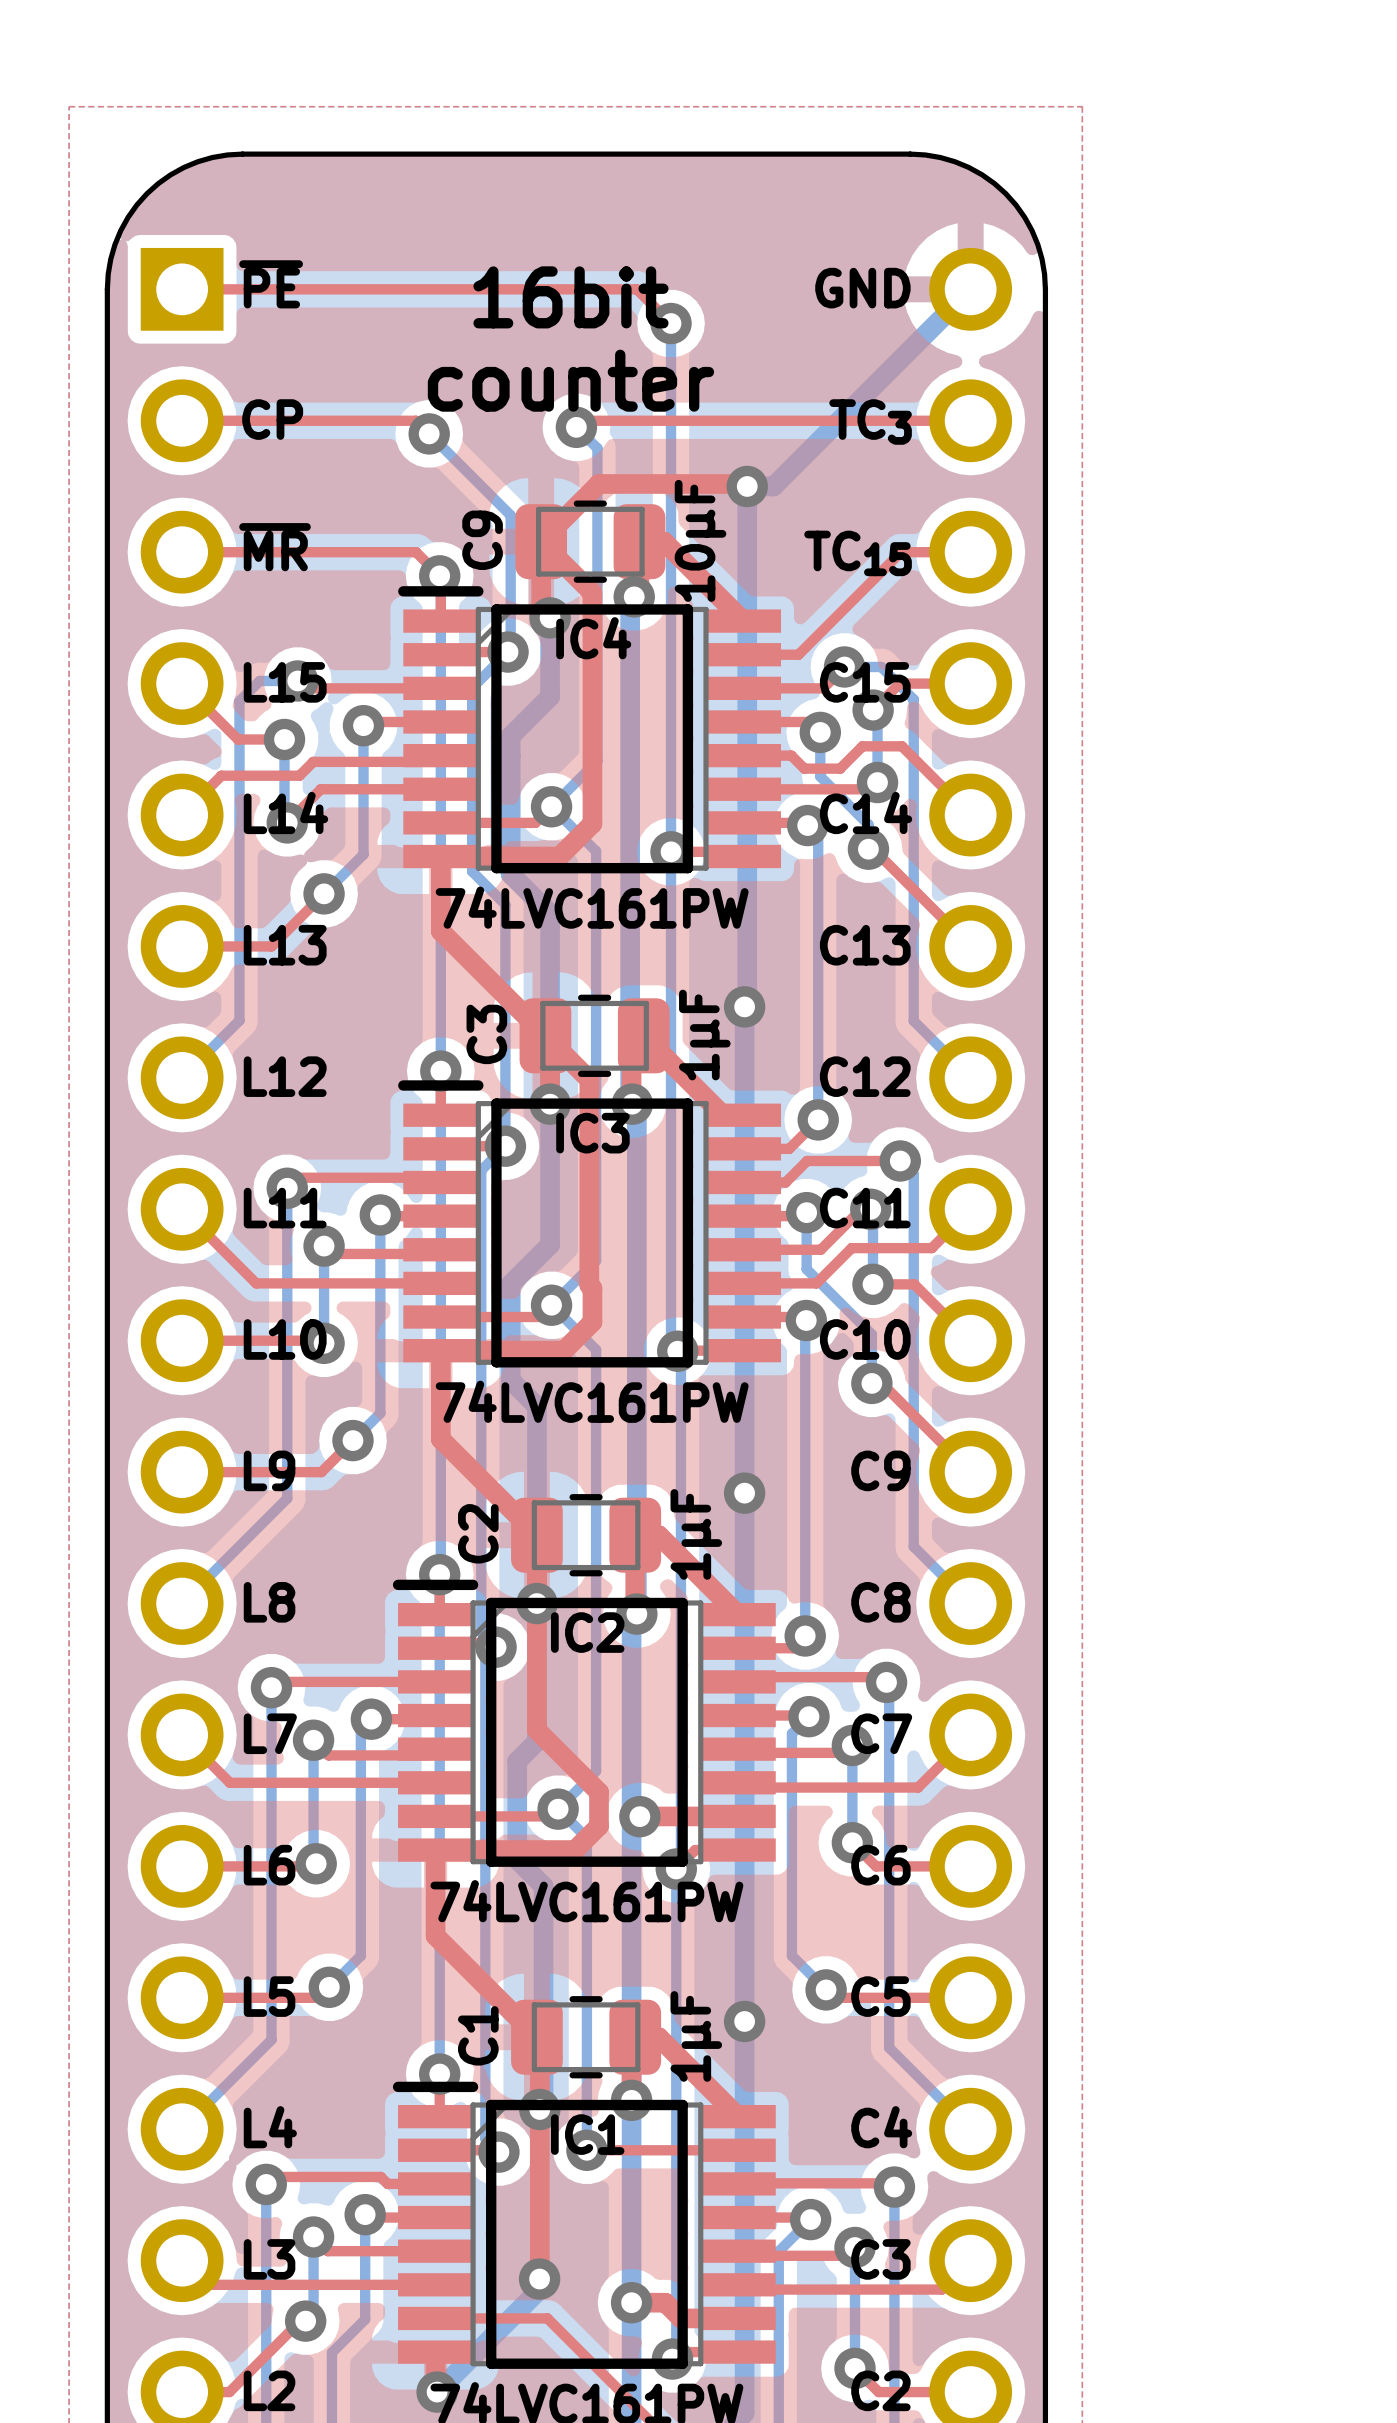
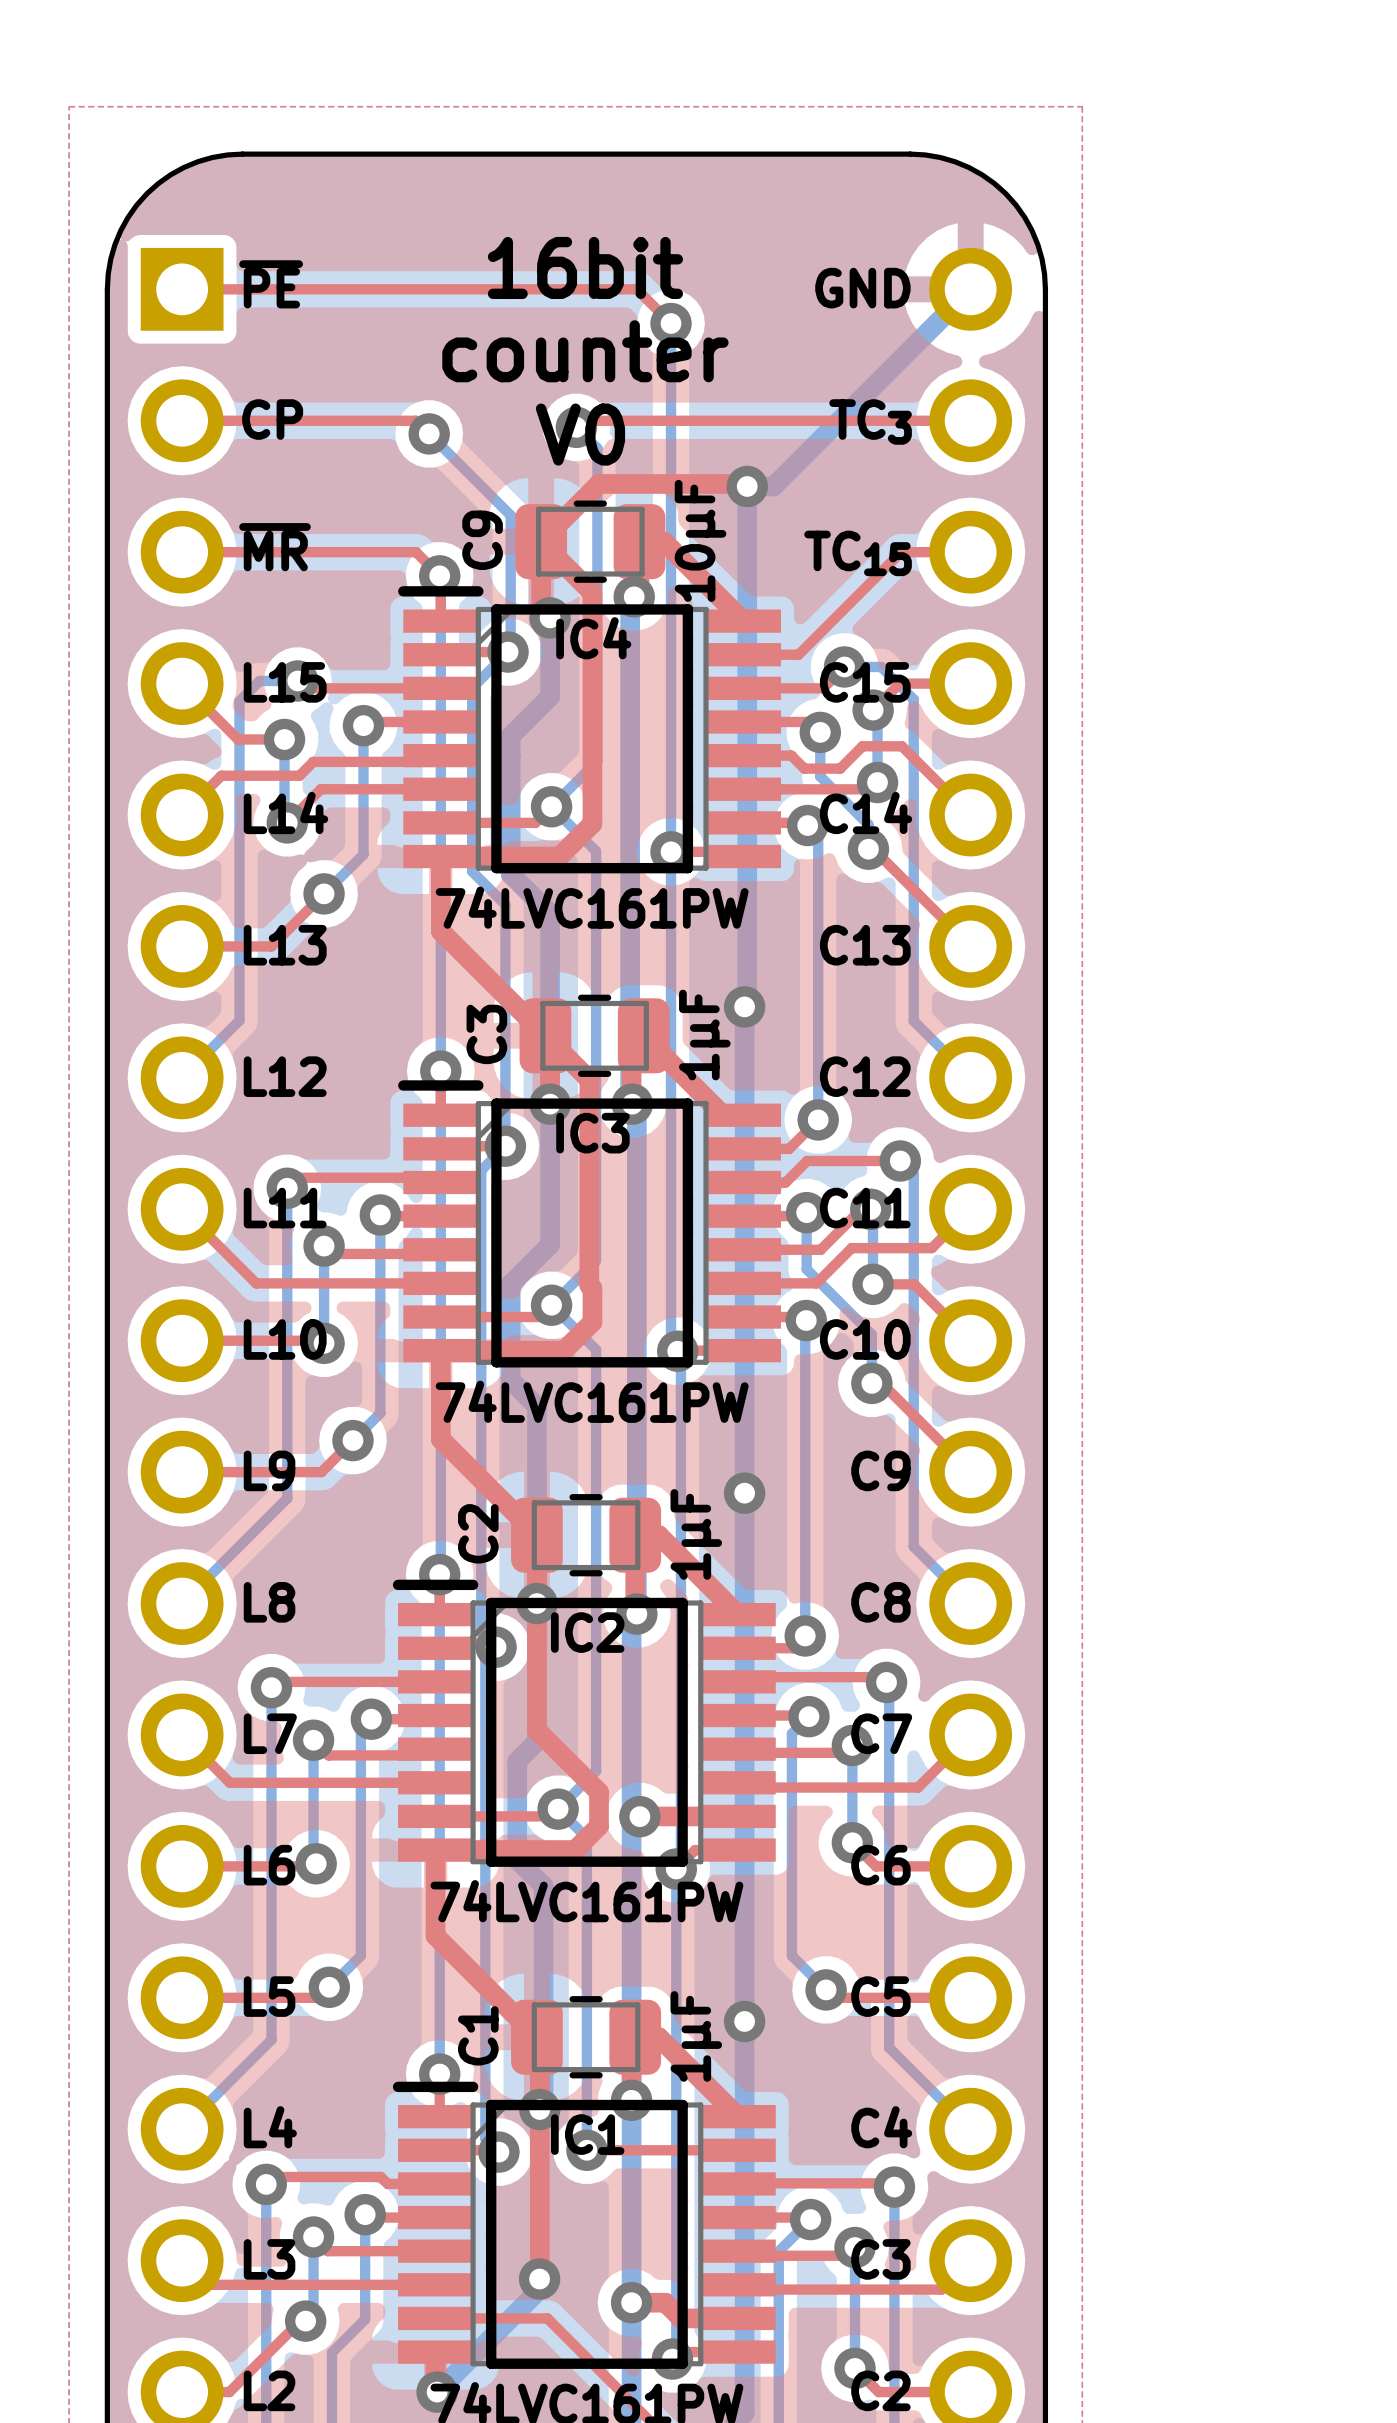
text position: 16bit (570, 297) -> 16bit (585, 267)
text position: counter (570, 380) -> counter (585, 351)
text: none -> V0 (580, 434)

